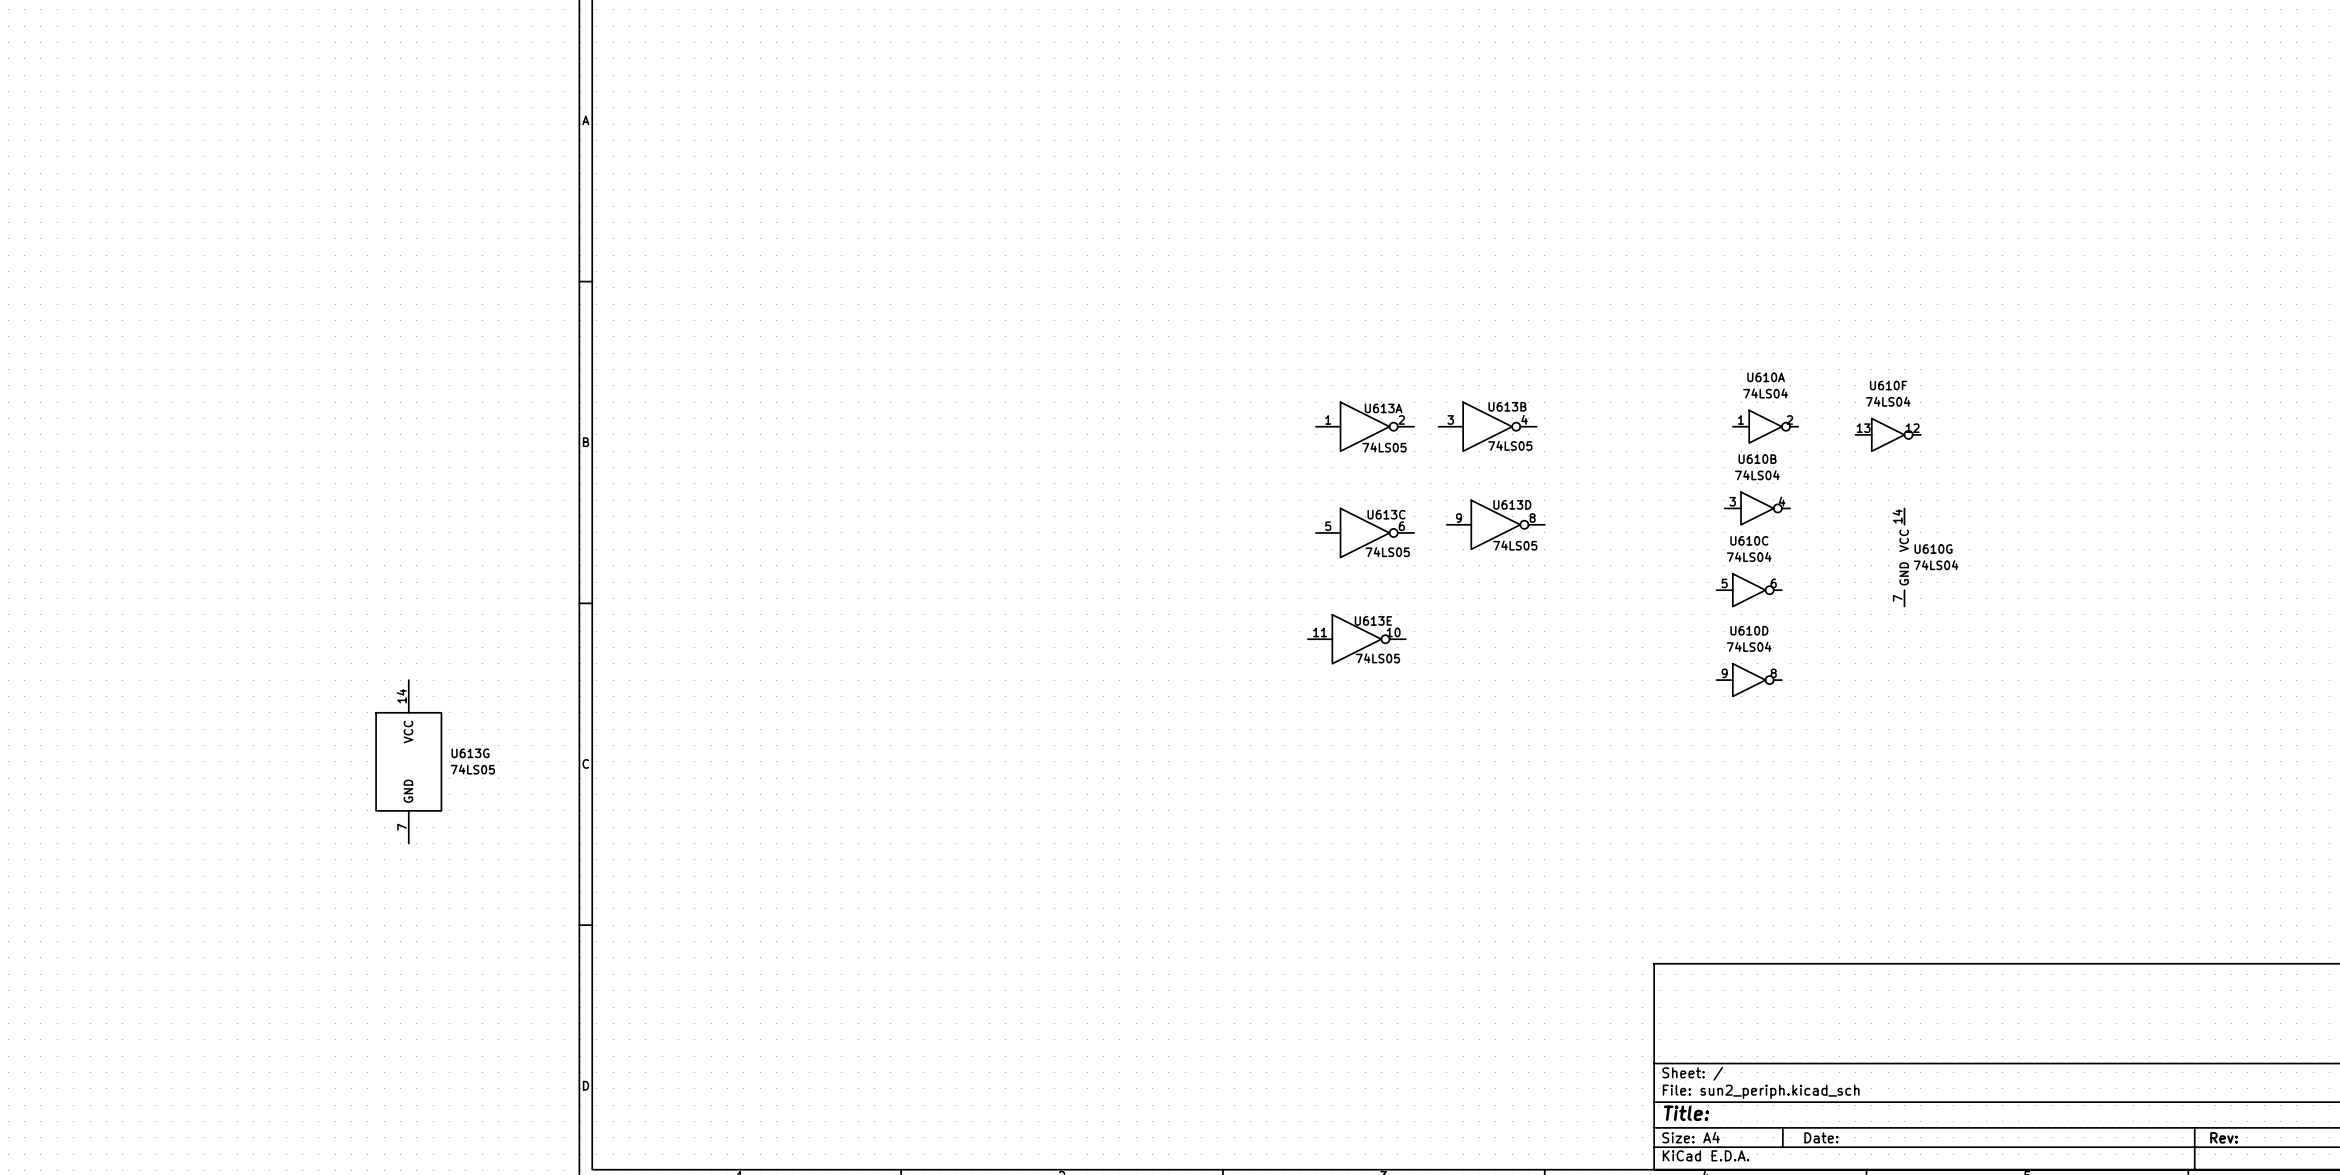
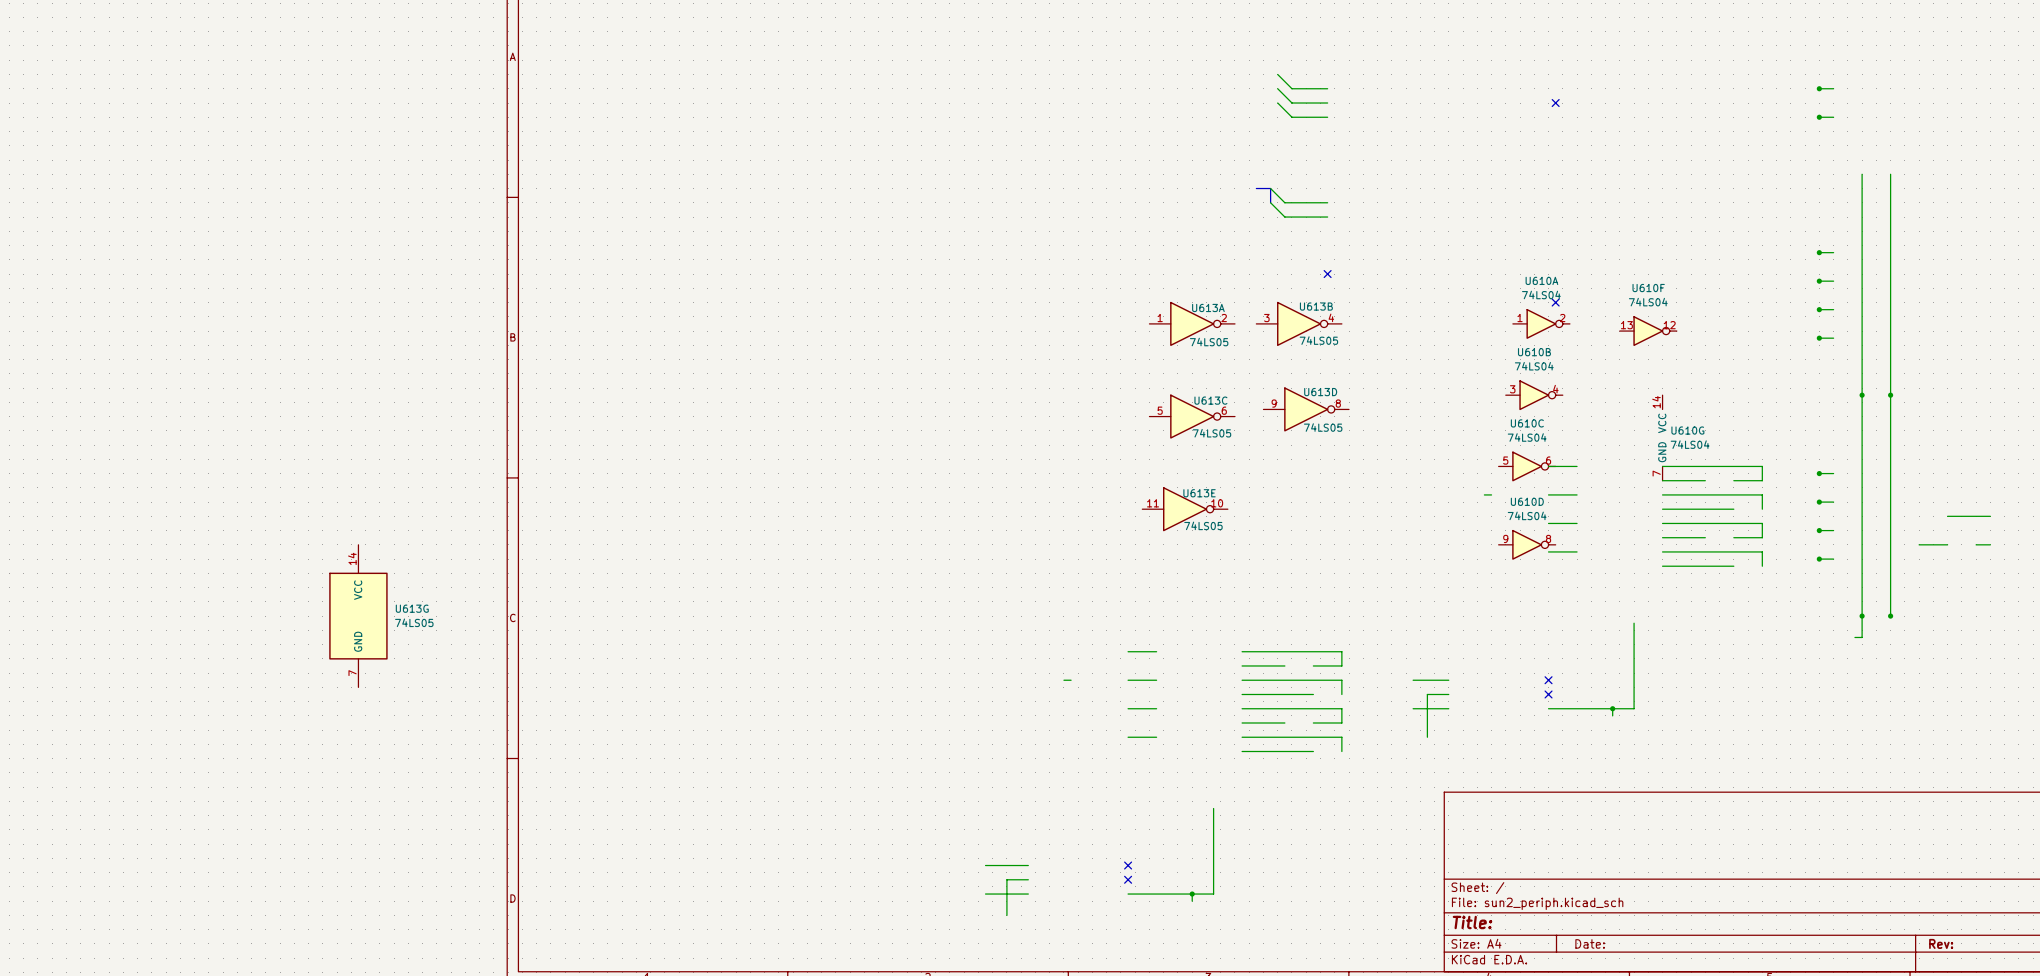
wire: none -> (1277, 74) (1291, 88) (1327, 88)
wire: none -> (1277, 88) (1291, 103) (1327, 103)
wire: none -> (1819, 88) (1833, 88)
junction: none -> (1819, 88)
wire: none -> (1277, 103) (1291, 117) (1327, 117)
no-connect mark: none -> (1555, 103)
wire: none -> (1819, 117) (1833, 117)
junction: none -> (1819, 117)
wire: none -> (1862, 174) (1862, 637) (1854, 637)
wire: none -> (1890, 174) (1890, 616)
bus: none -> (1256, 188) (1270, 188) (1270, 202)
wire: none -> (1270, 188) (1284, 202) (1327, 202)
wire: none -> (1270, 202) (1284, 217) (1327, 217)
wire: none -> (1819, 252) (1833, 252)
junction: none -> (1819, 252)
no-connect mark: none -> (1327, 274)
wire: none -> (1819, 281) (1833, 281)
junction: none -> (1819, 281)
no-connect mark: none -> (1555, 302)
wire: none -> (1819, 309) (1833, 309)
junction: none -> (1819, 309)
wire: none -> (1819, 338) (1833, 338)
junction: none -> (1819, 338)
junction: none -> (1862, 395)
junction: none -> (1890, 395)
wire: none -> (1548, 466) (1577, 466)
wire: none -> (1662, 466) (1762, 466) (1762, 480) (1733, 480)
wire: none -> (1819, 473) (1833, 473)
junction: none -> (1819, 473)
wire: none -> (1662, 480) (1705, 480)
wire: none -> (1484, 494) (1491, 494)
wire: none -> (1548, 494) (1577, 494)
wire: none -> (1662, 494) (1762, 494) (1762, 509)
wire: none -> (1819, 502) (1833, 502)
junction: none -> (1819, 502)
wire: none -> (1662, 509) (1733, 509)
wire: none -> (1947, 516) (1990, 516)
wire: none -> (1548, 523) (1577, 523)
wire: none -> (1662, 523) (1762, 523) (1762, 537) (1733, 537)
wire: none -> (1819, 530) (1833, 530)
junction: none -> (1819, 530)
wire: none -> (1662, 537) (1705, 537)
wire: none -> (1919, 544) (1947, 544)
wire: none -> (1976, 544) (1990, 544)
wire: none -> (1548, 551) (1577, 551)
wire: none -> (1662, 551) (1762, 551) (1762, 566)
wire: none -> (1819, 559) (1833, 559)
junction: none -> (1819, 559)
wire: none -> (1662, 566) (1733, 566)
junction: none -> (1862, 616)
junction: none -> (1890, 616)
wire: none -> (1634, 623) (1634, 708) (1548, 708)
wire: none -> (1128, 651) (1156, 651)
wire: none -> (1242, 651) (1341, 651) (1341, 665) (1313, 665)
wire: none -> (1242, 665) (1284, 665)
wire: none -> (1063, 680) (1071, 680)
wire: none -> (1128, 680) (1156, 680)
wire: none -> (1242, 680) (1341, 680) (1341, 694)
wire: none -> (1413, 680) (1448, 680)
no-connect mark: none -> (1548, 680)
wire: none -> (1242, 694) (1313, 694)
wire: none -> (1448, 694) (1427, 694) (1427, 737)
no-connect mark: none -> (1548, 694)
wire: none -> (1128, 708) (1156, 708)
wire: none -> (1242, 708) (1341, 708) (1341, 722) (1313, 722)
wire: none -> (1413, 708) (1448, 708)
wire: none -> (1612, 708) (1612, 715)
junction: none -> (1612, 708)
wire: none -> (1242, 722) (1284, 722)
wire: none -> (1128, 737) (1156, 737)
wire: none -> (1242, 737) (1341, 737) (1341, 751)
wire: none -> (1242, 751) (1313, 751)
wire: none -> (1213, 808) (1213, 894) (1128, 894)
wire: none -> (985, 865) (1028, 865)
no-connect mark: none -> (1128, 865)
wire: none -> (1028, 879) (1006, 879) (1006, 915)
no-connect mark: none -> (1128, 879)
wire: none -> (985, 894) (1028, 894)
wire: none -> (1192, 894) (1192, 901)
junction: none -> (1192, 894)

